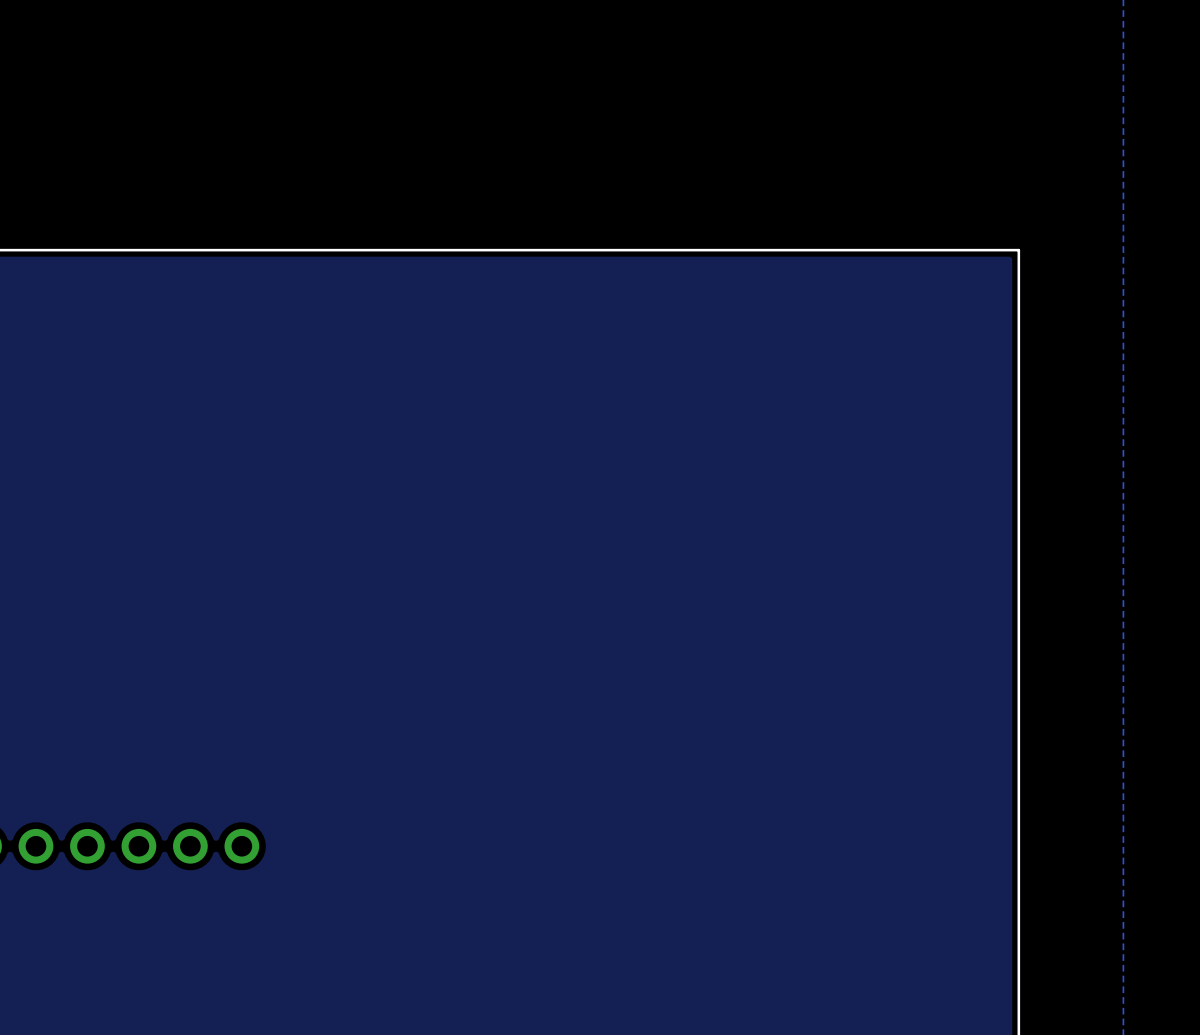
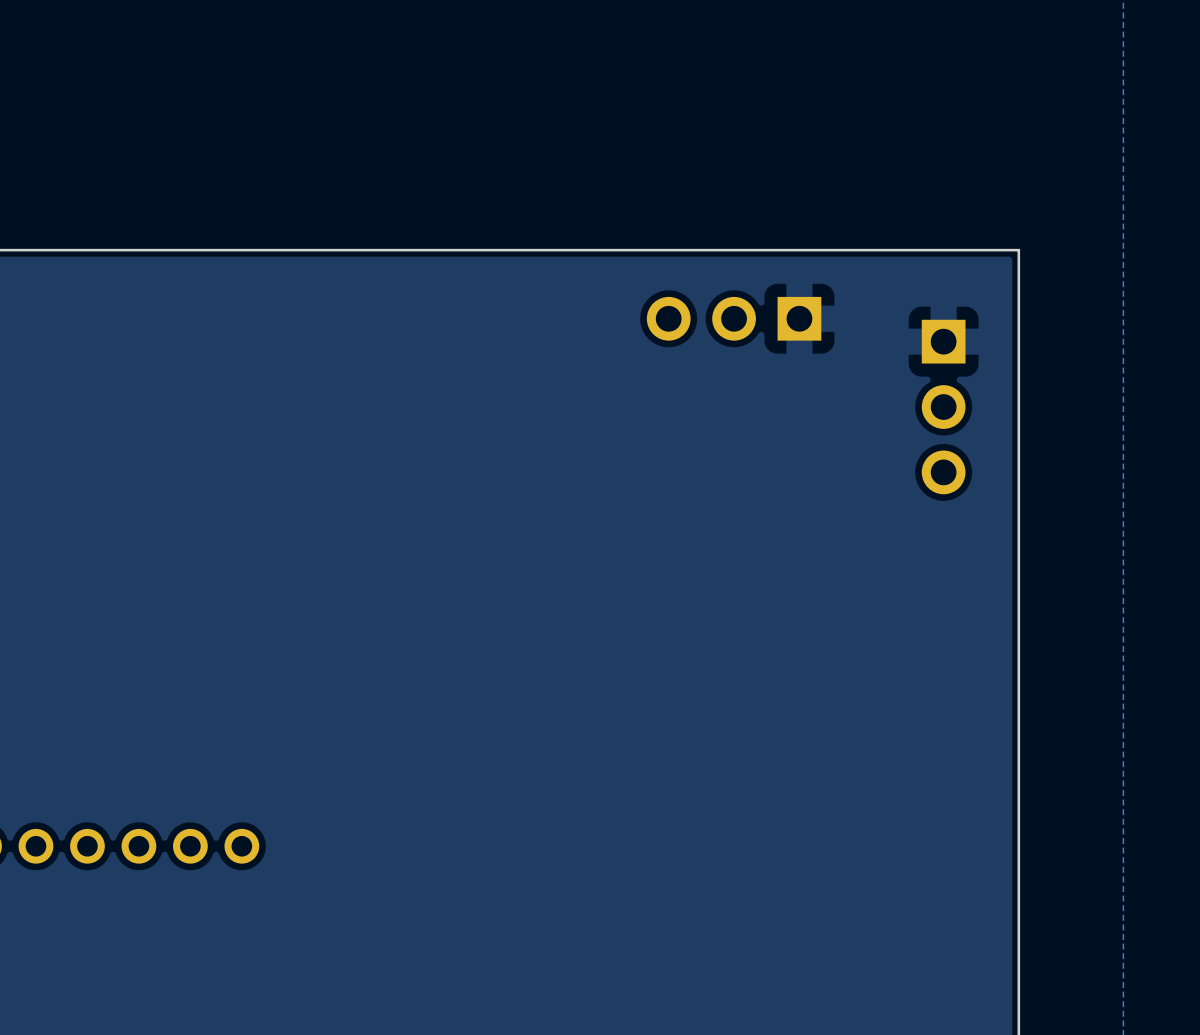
part: none -> (734, 318)
part: none -> (943, 407)

